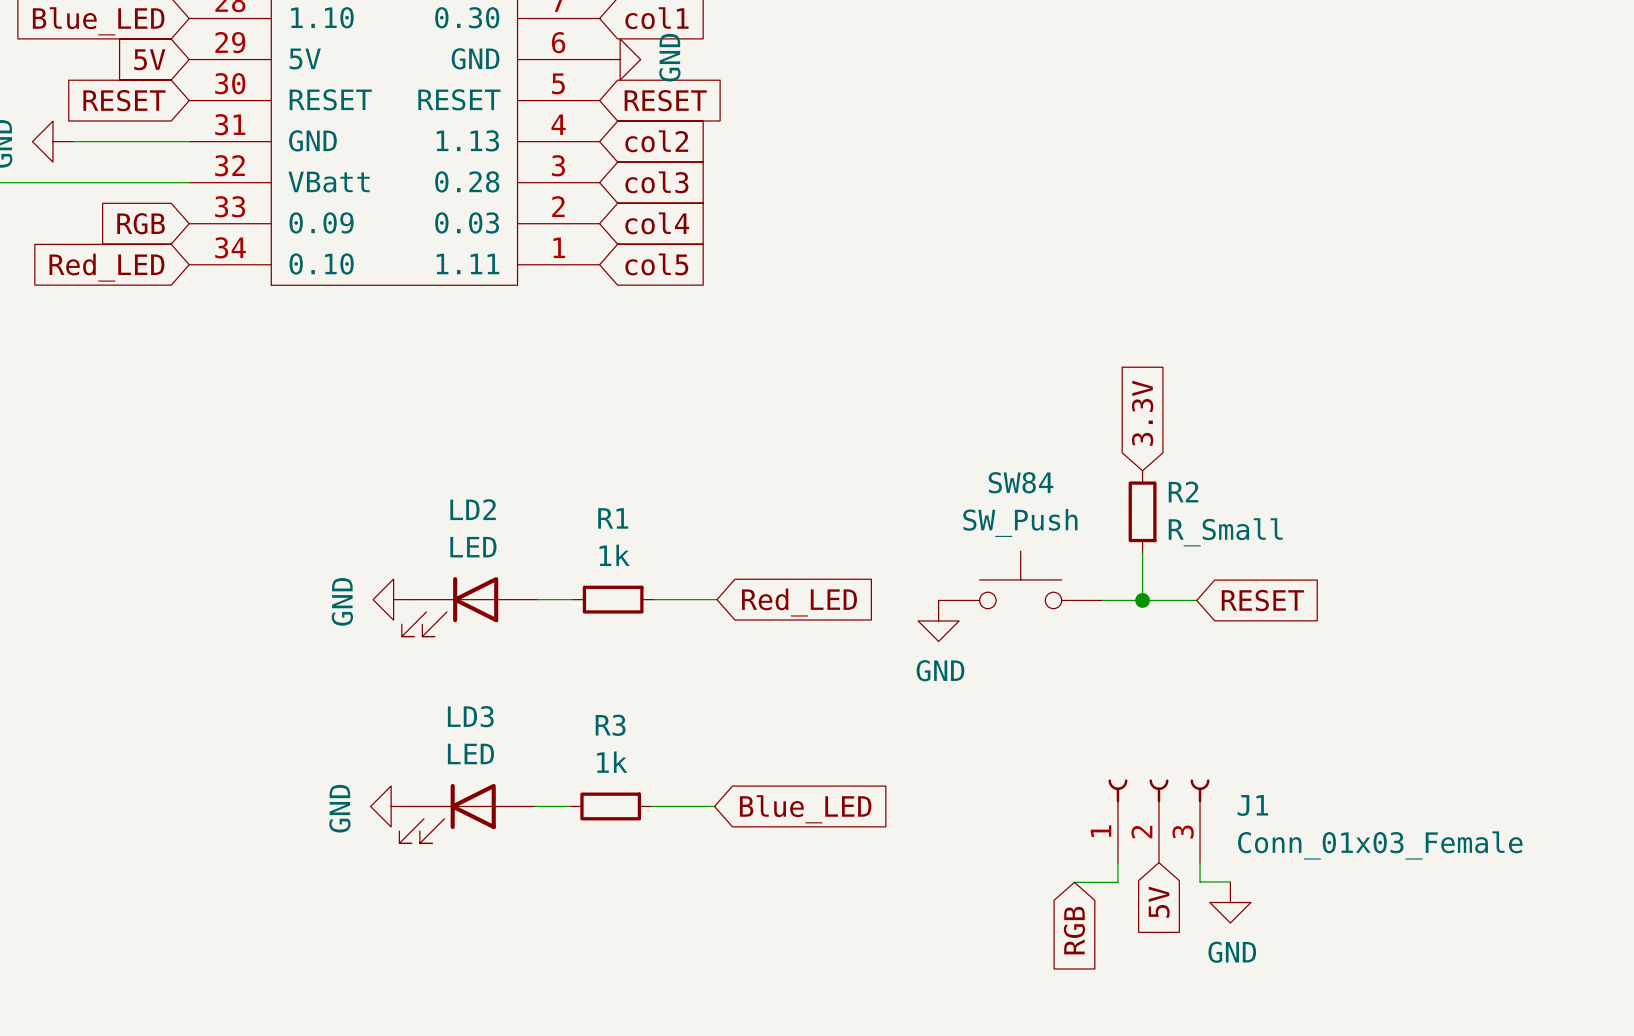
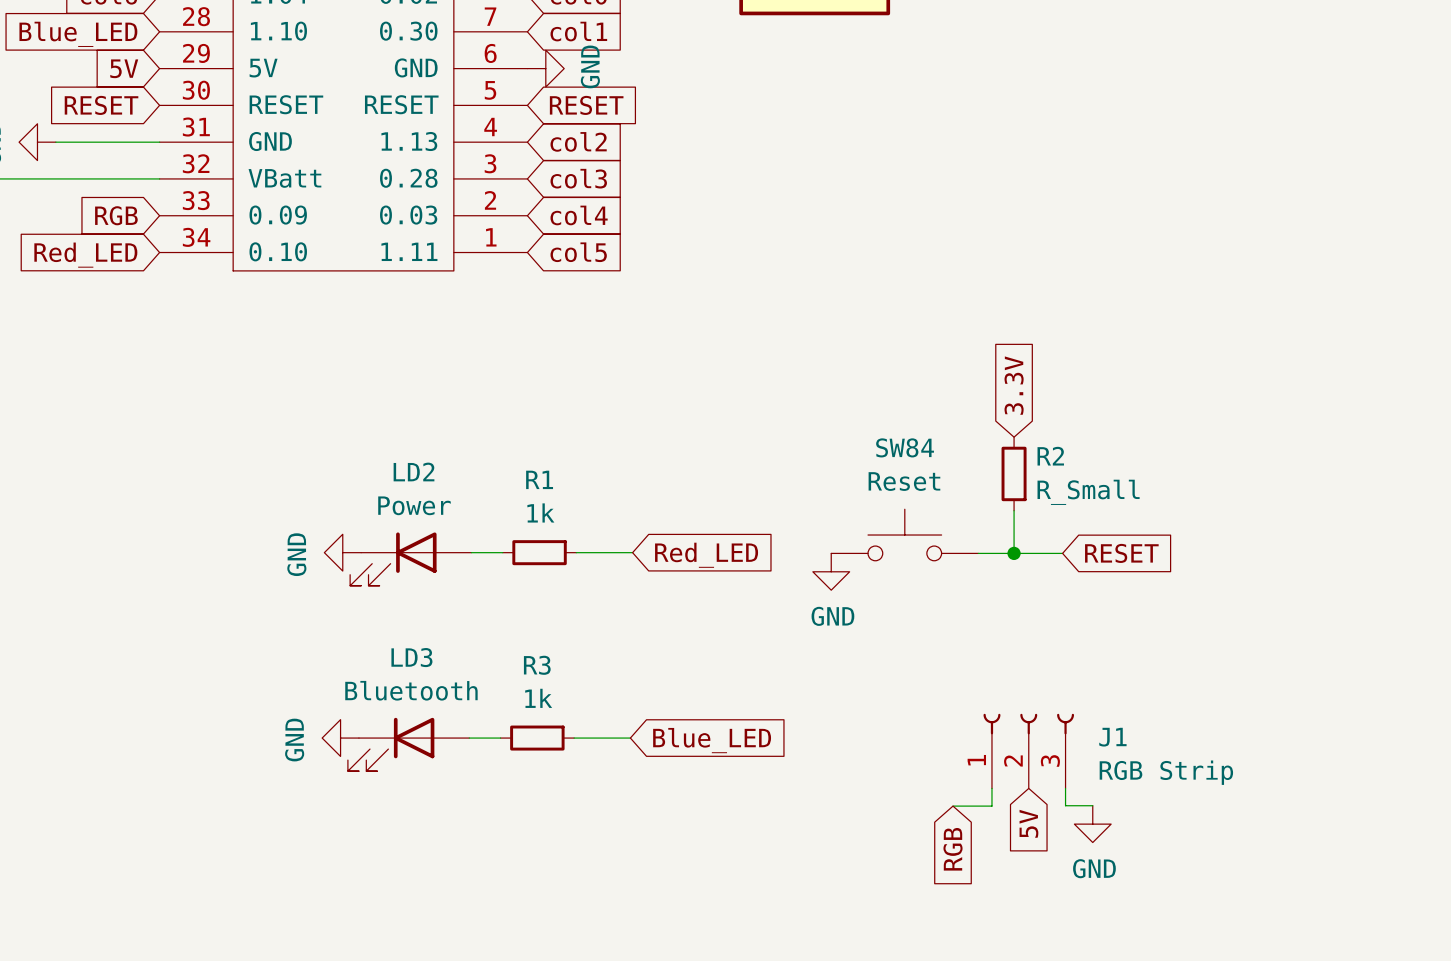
SW84 value: SW_Push (1020, 522) -> Reset (904, 481)
LD2 value: LED (473, 547) -> Power (414, 505)
LD3 value: LED (470, 753) -> Bluetooth (411, 690)
J1 value: Conn_01x03_Female (1380, 845) -> RGB Strip (1166, 772)

